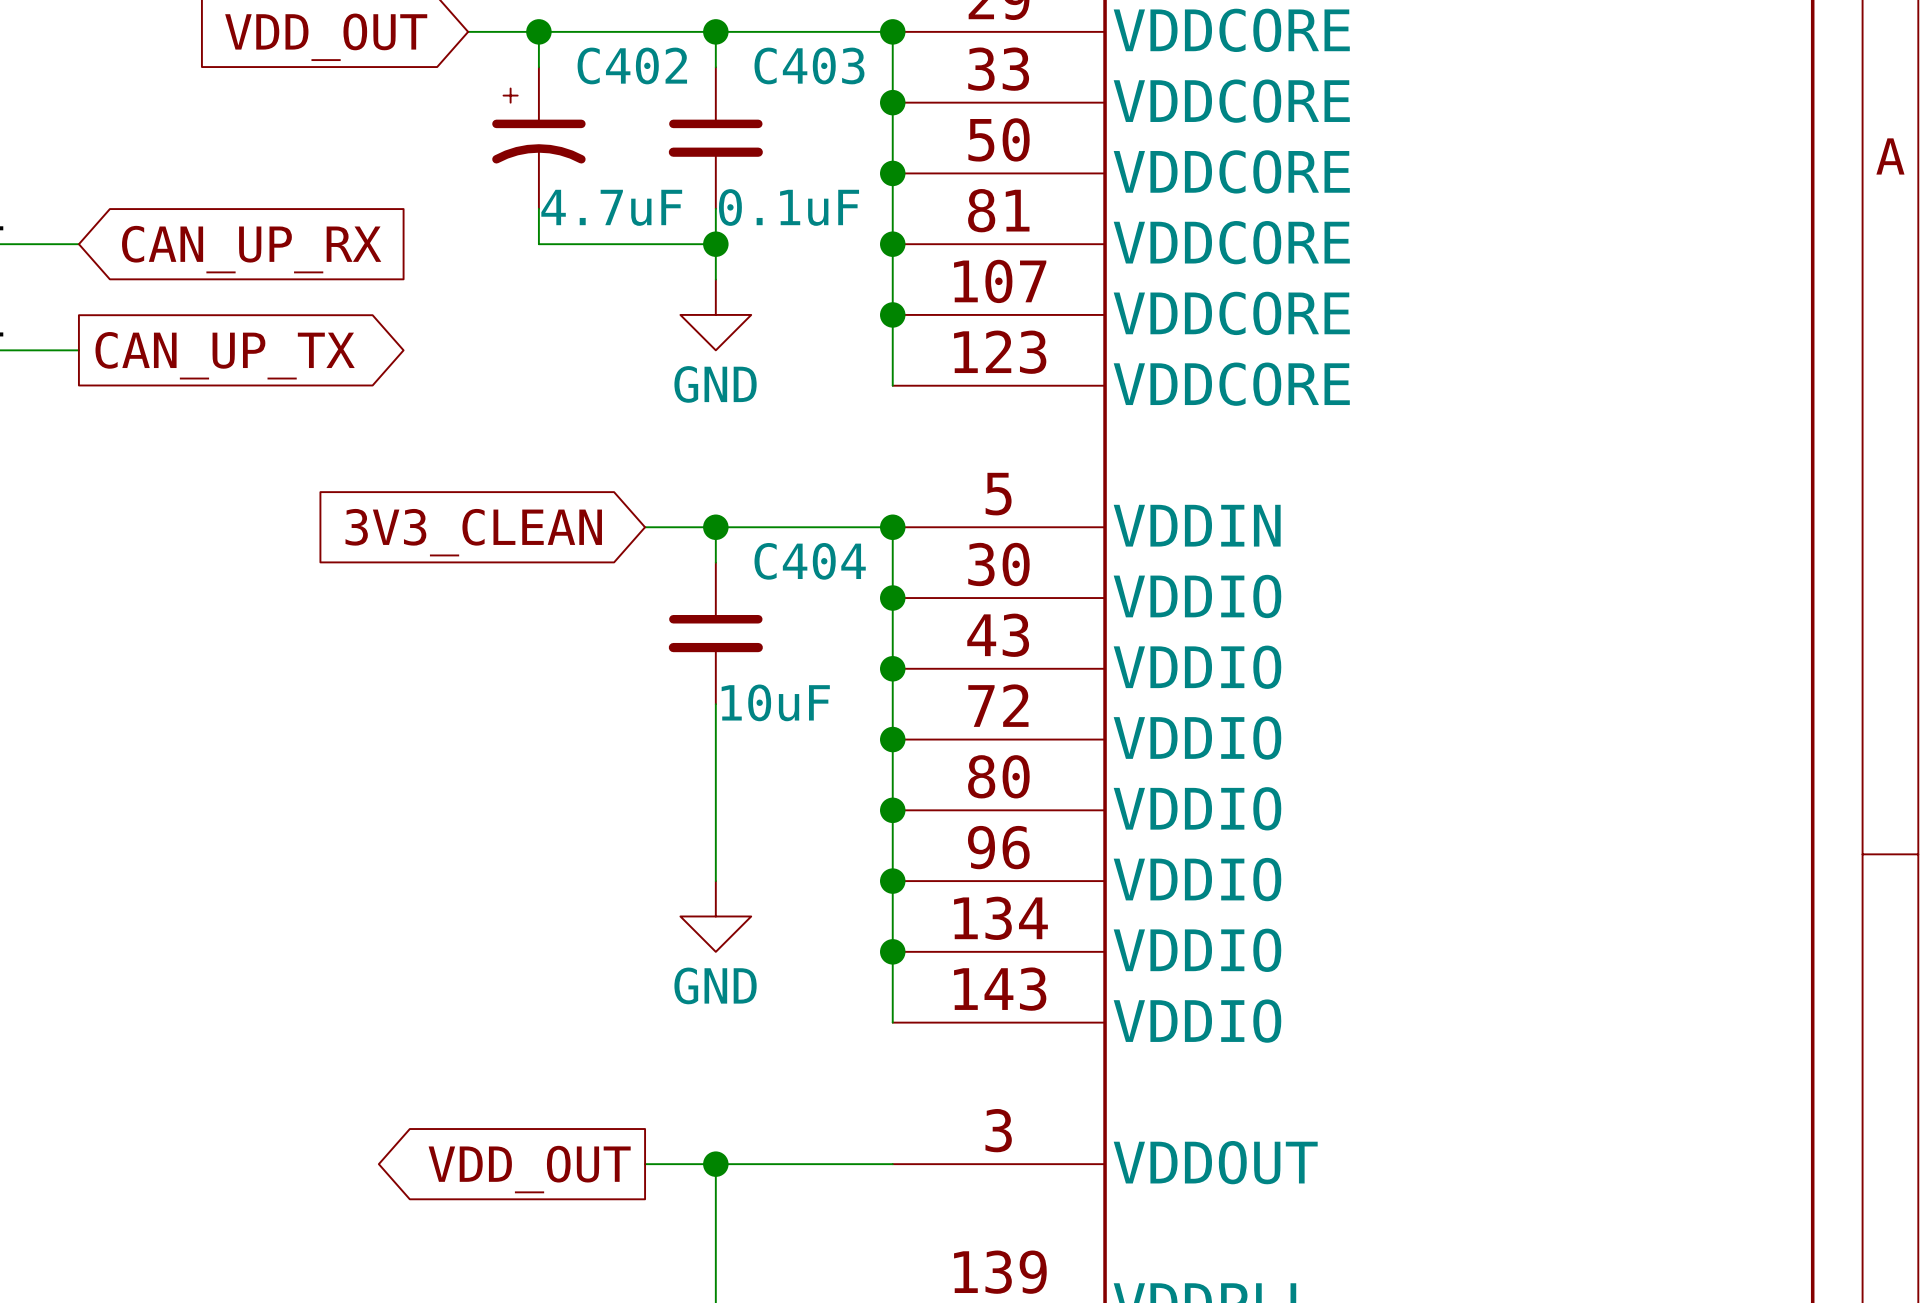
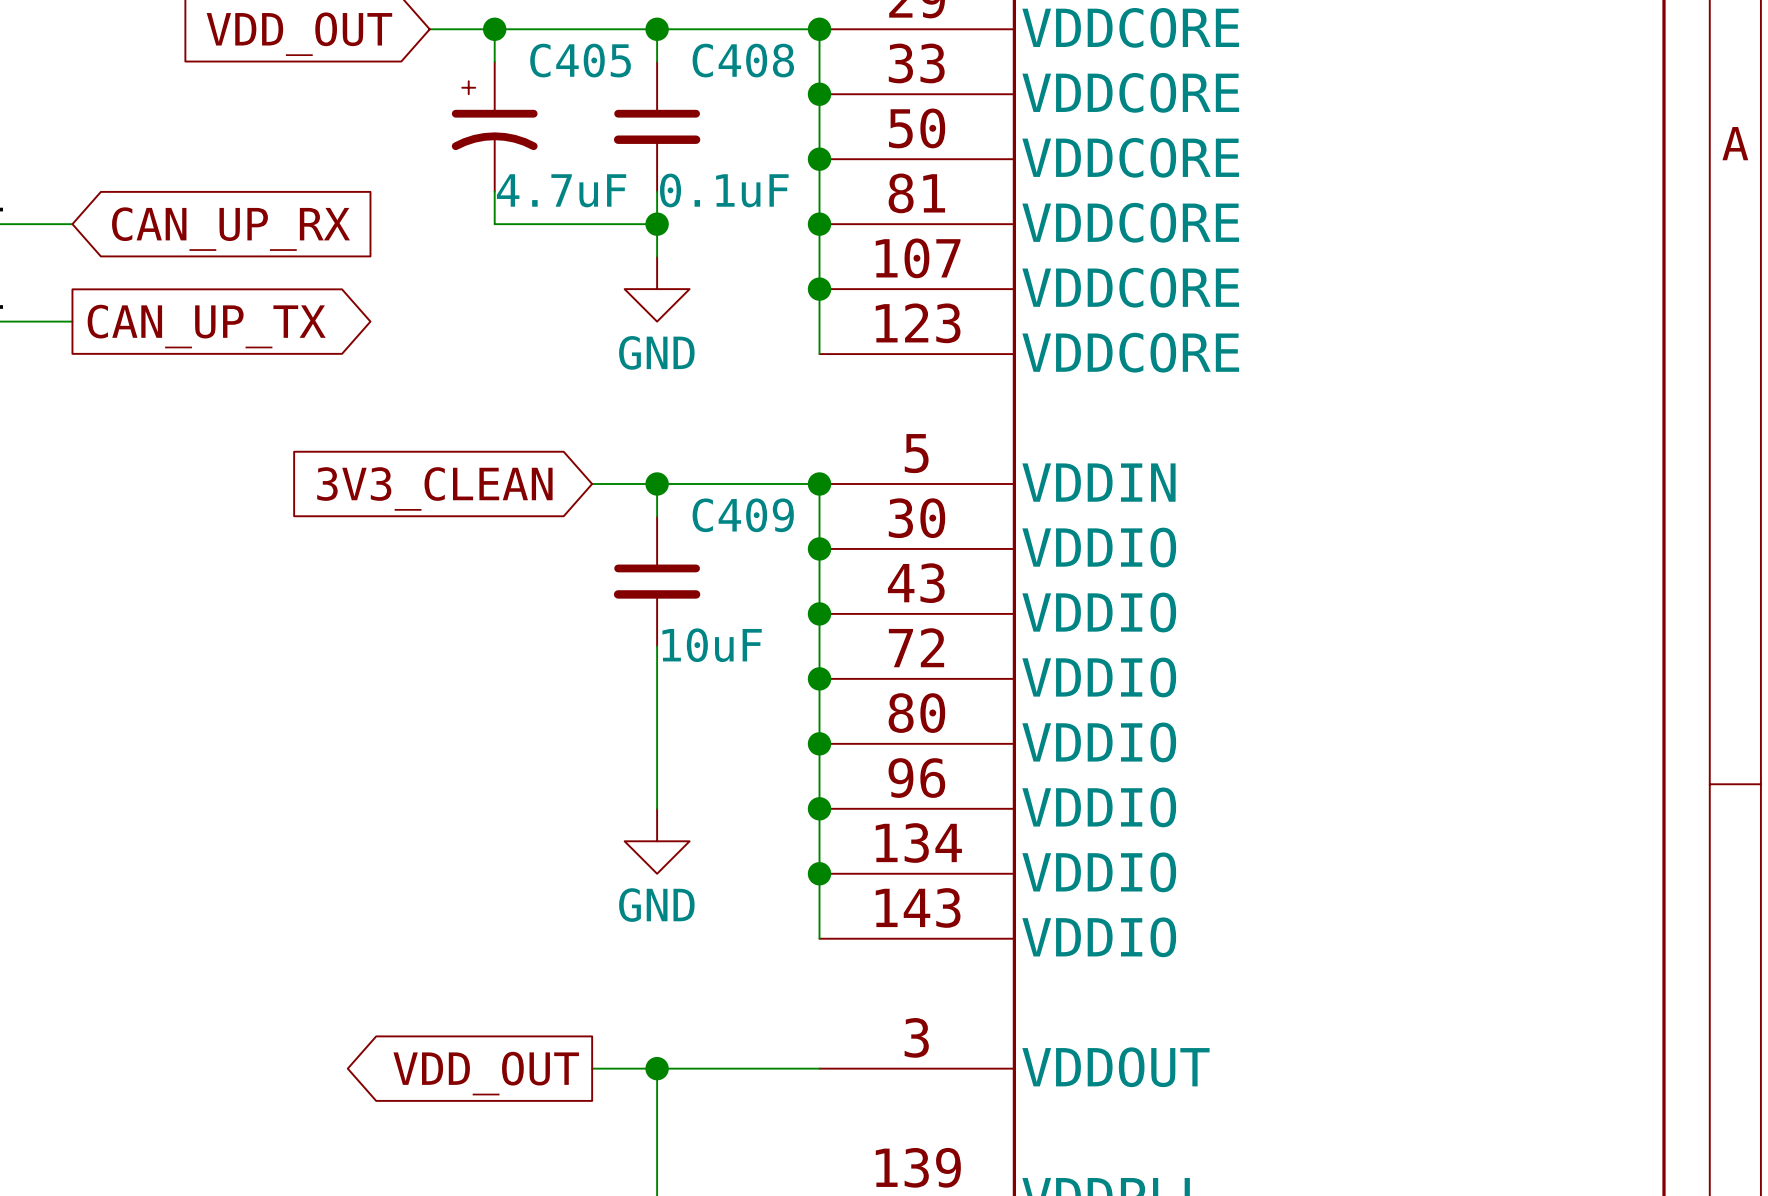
C402 name: C402 (632, 65) -> C405 (580, 60)
C403 name: C403 (809, 65) -> C408 (743, 60)
C404 name: C404 (810, 561) -> C409 (743, 515)

